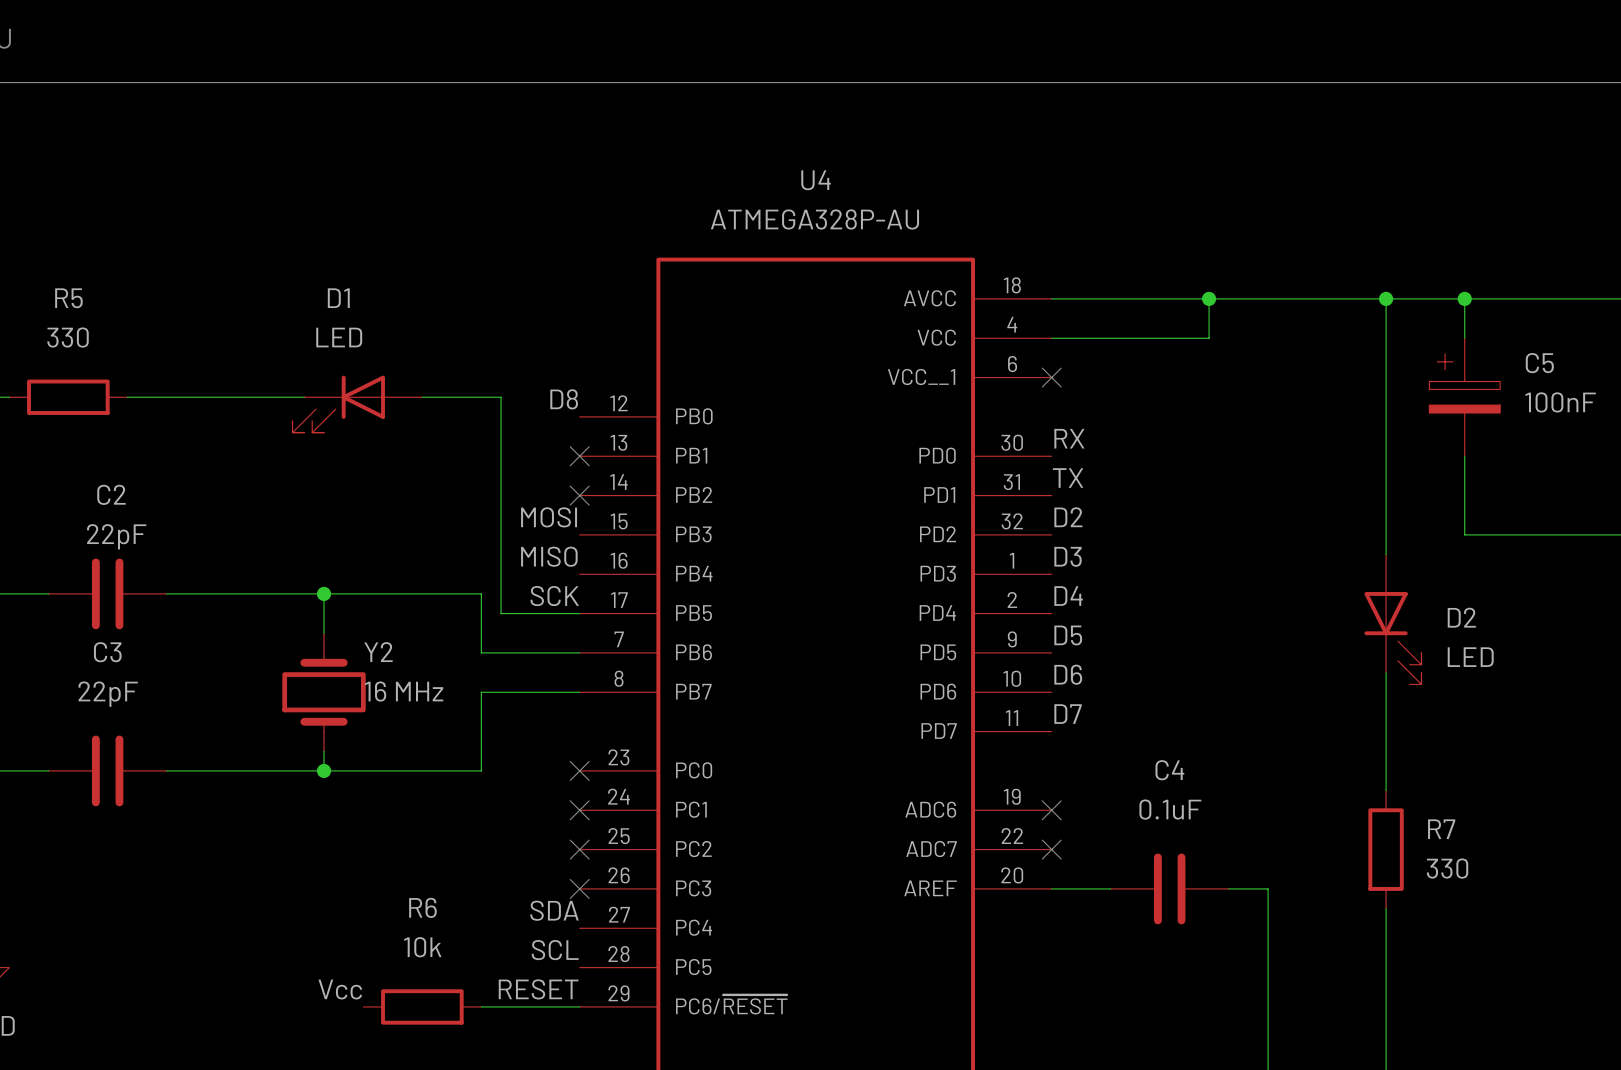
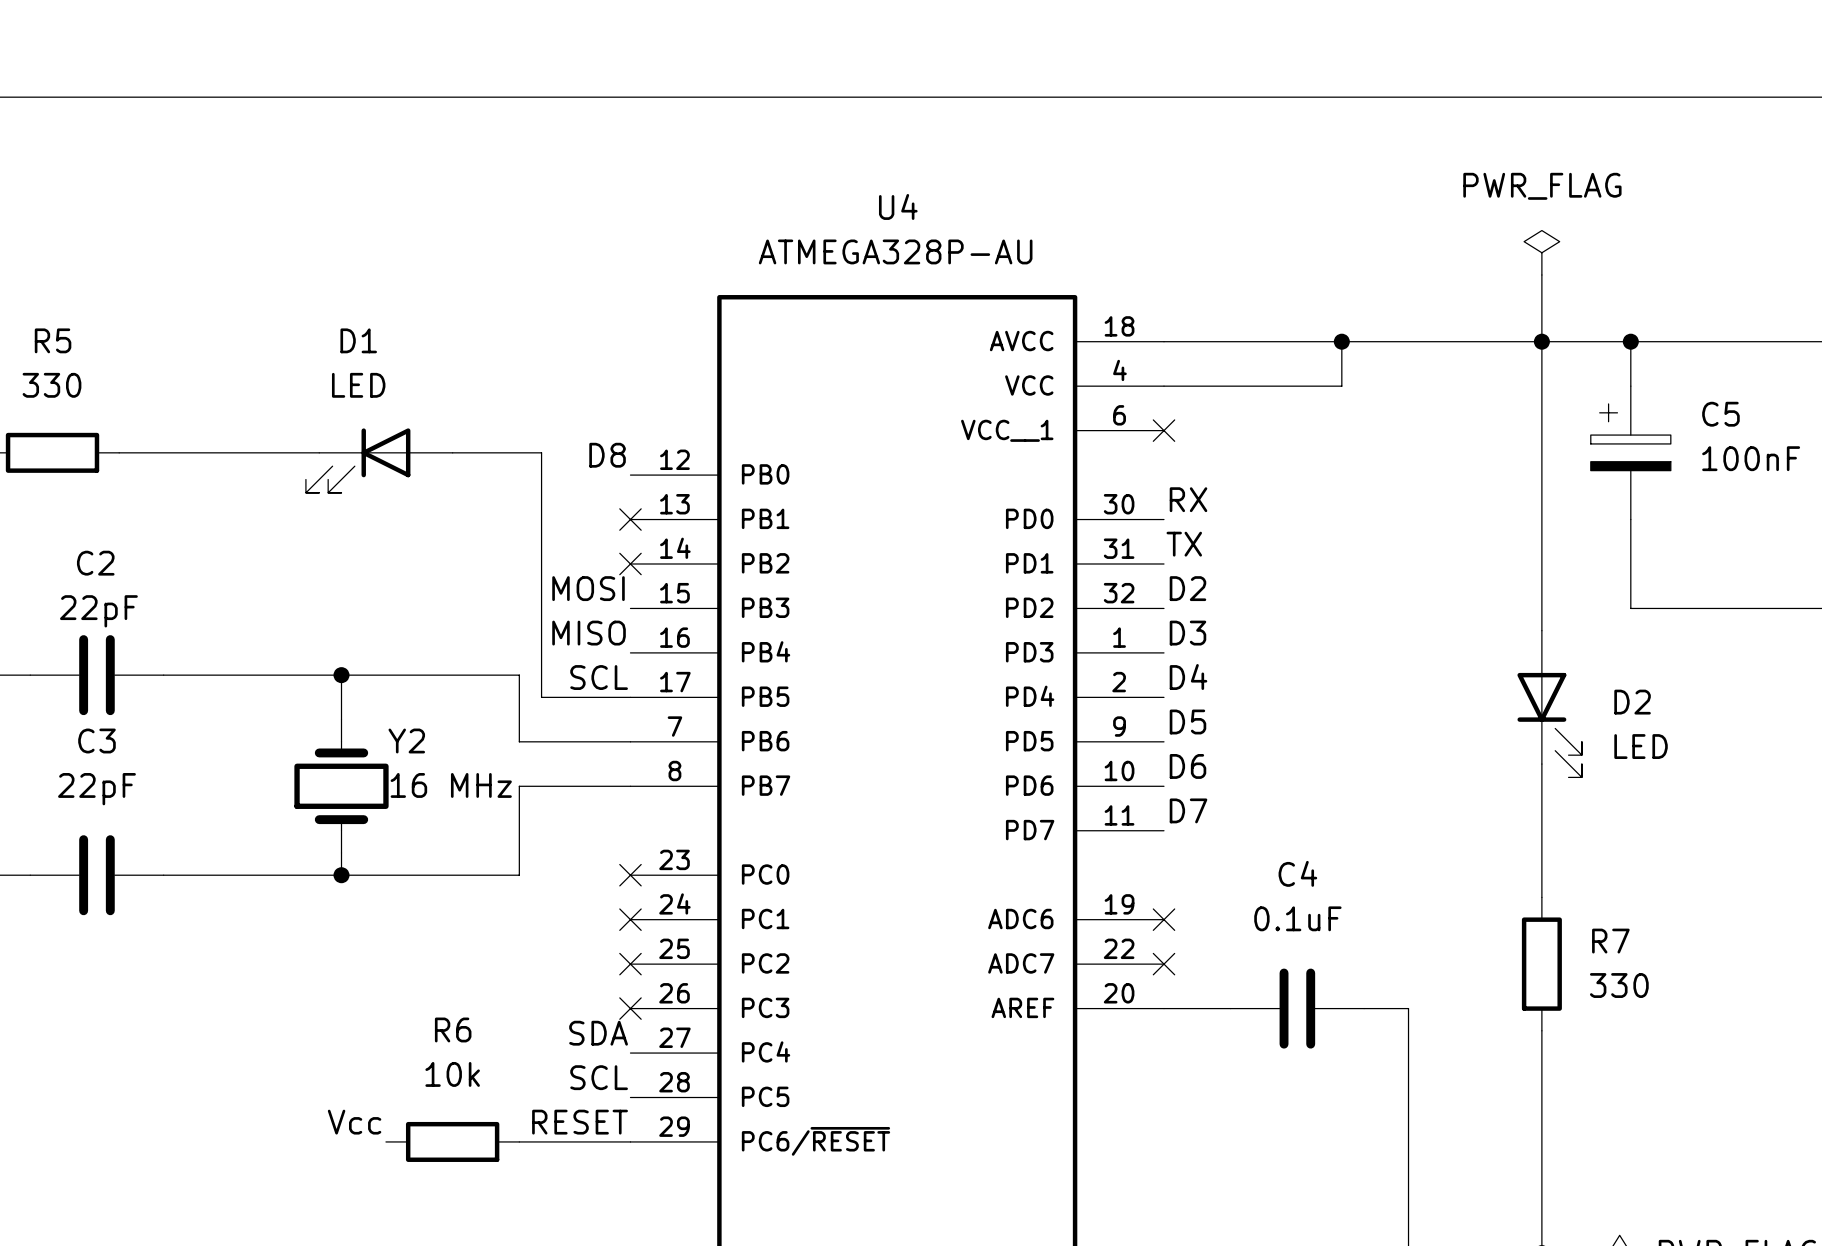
power symbol: none -> PWR_FLAG (1541, 252)
wire: none -> (1541, 275) (1541, 341)
label: SCK (554, 596) -> SCL (599, 677)

